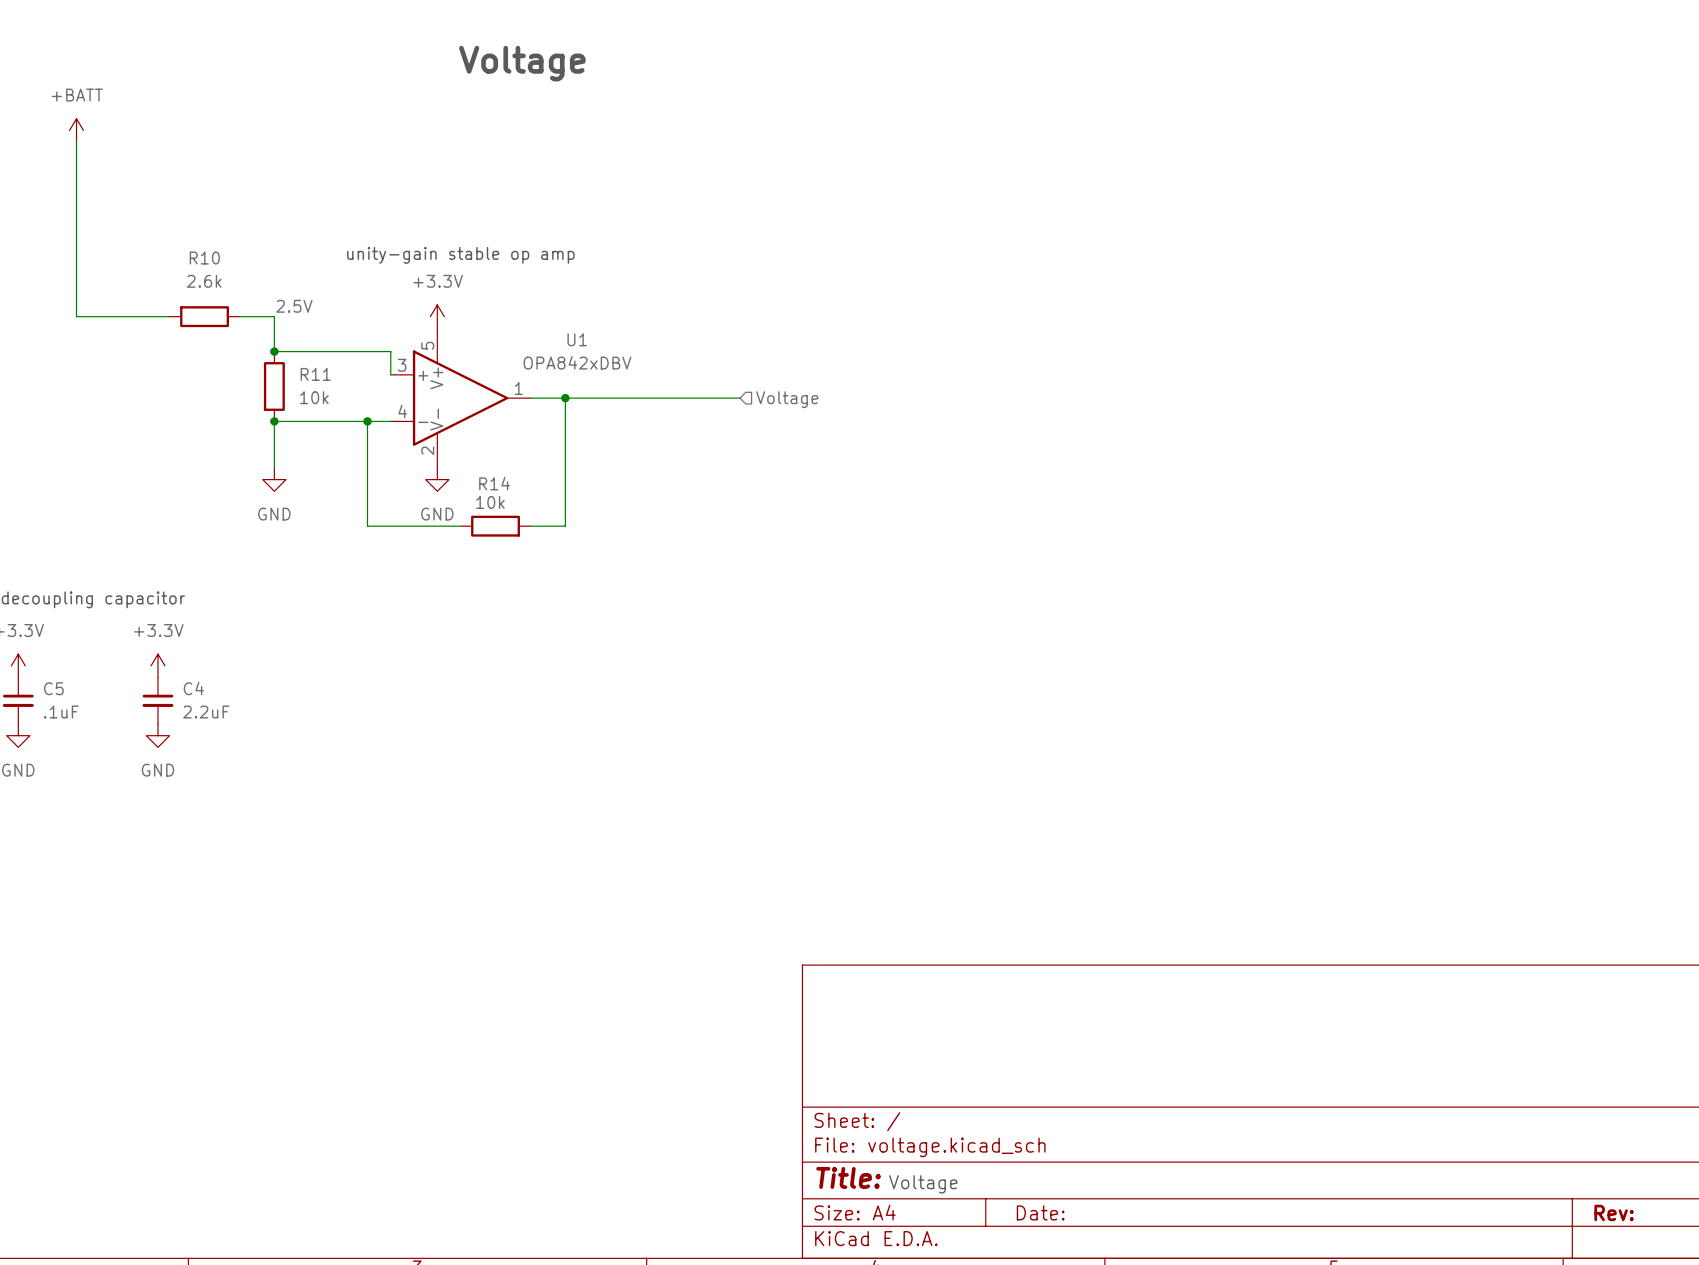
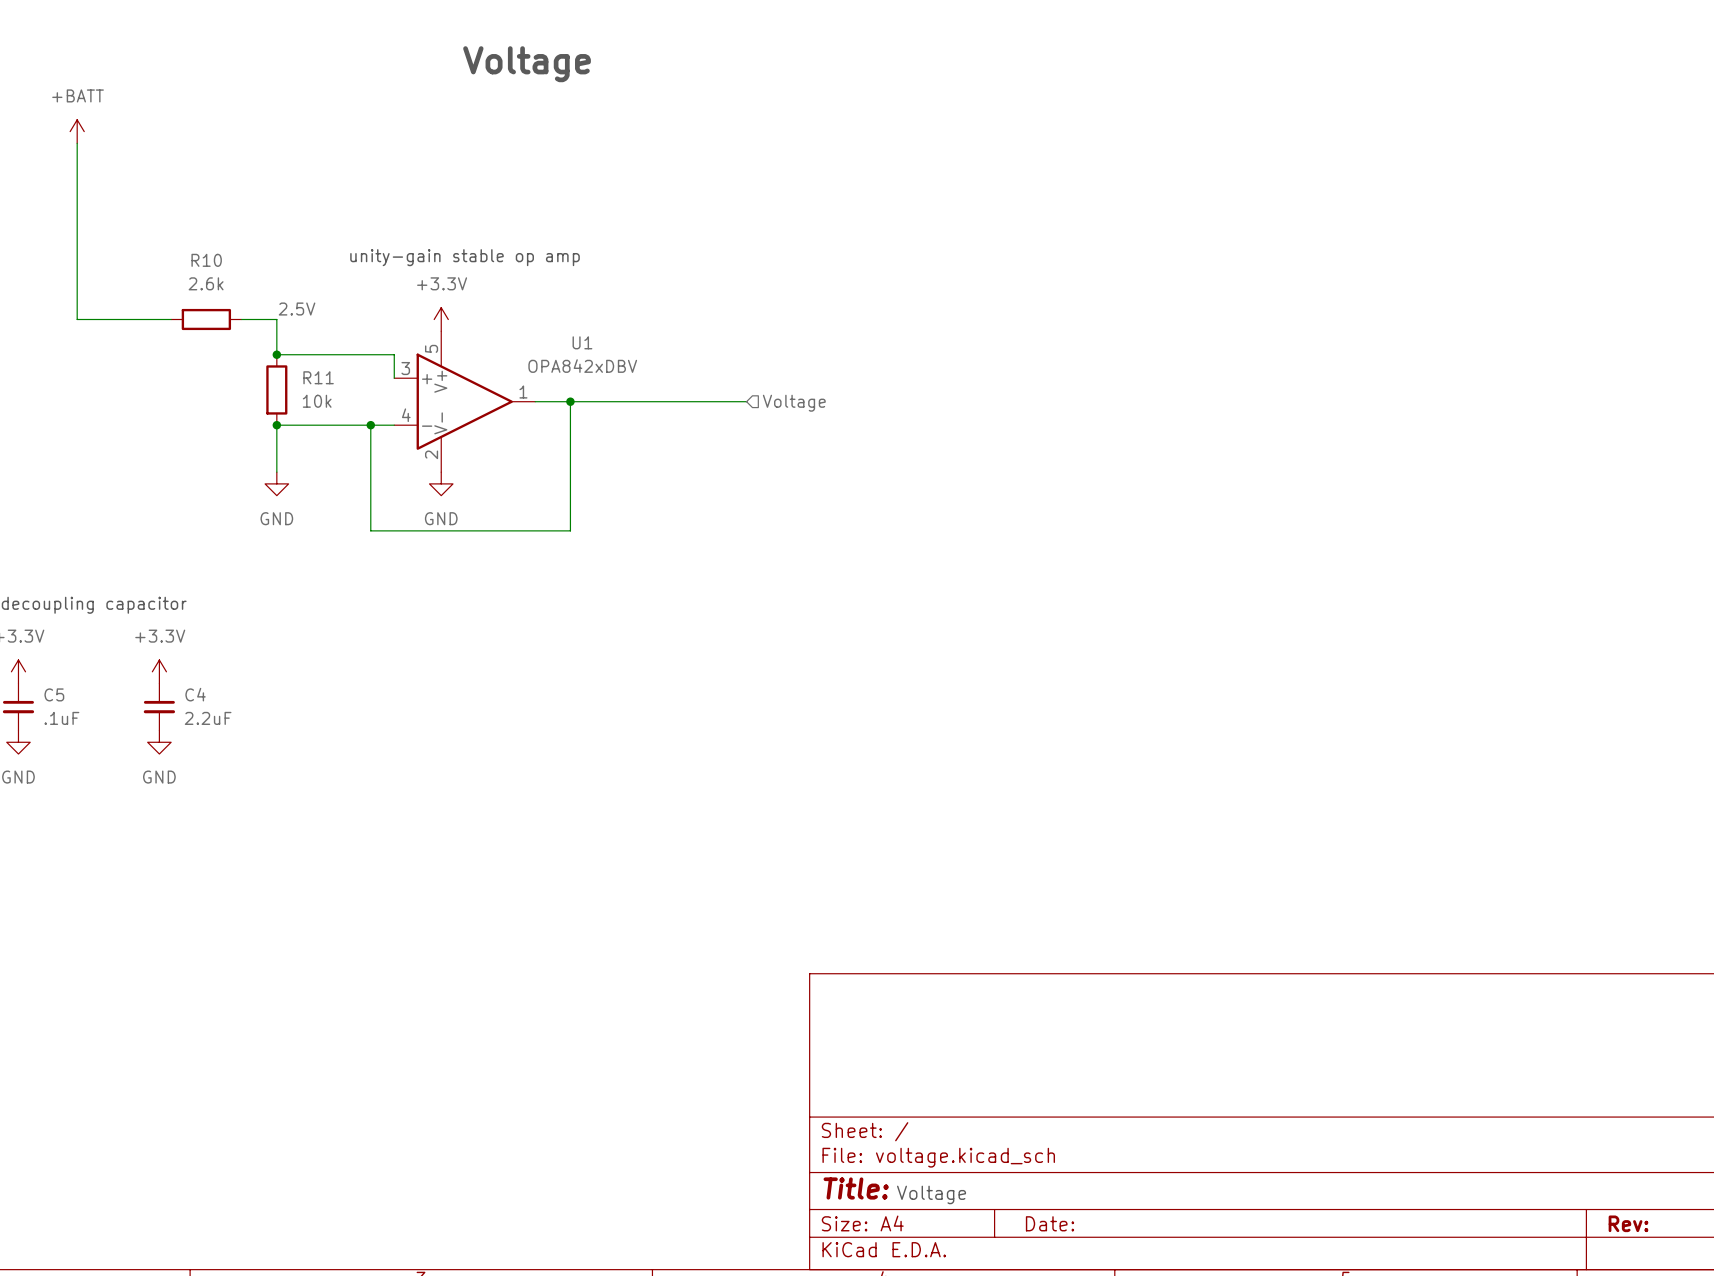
wire: none -> (464, 530) (535, 530)
R14: 10k (495, 526) -> none

